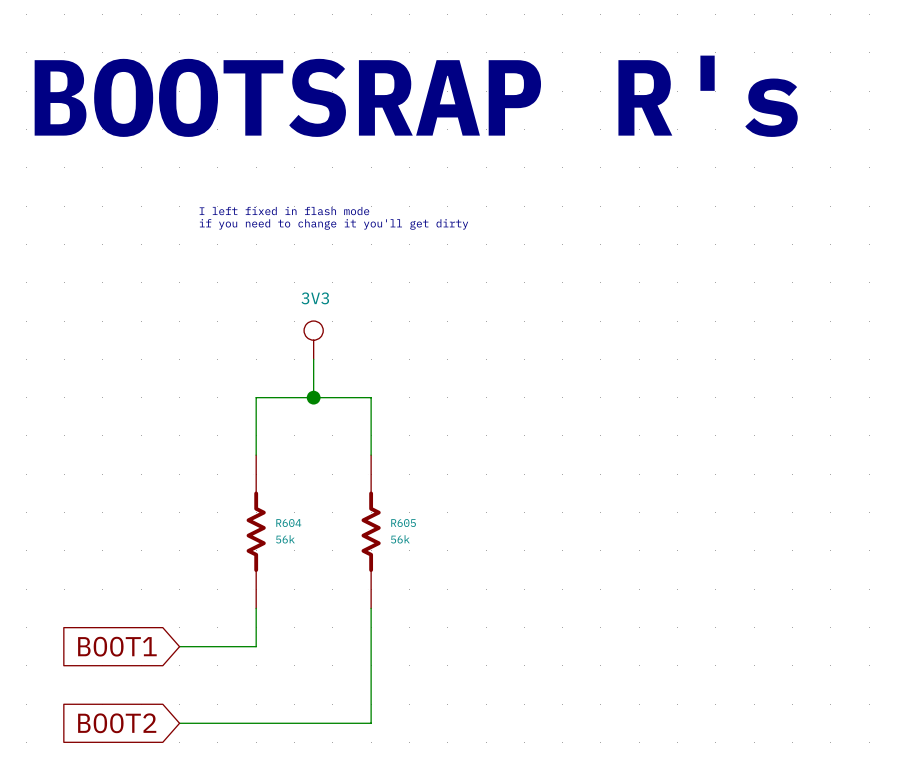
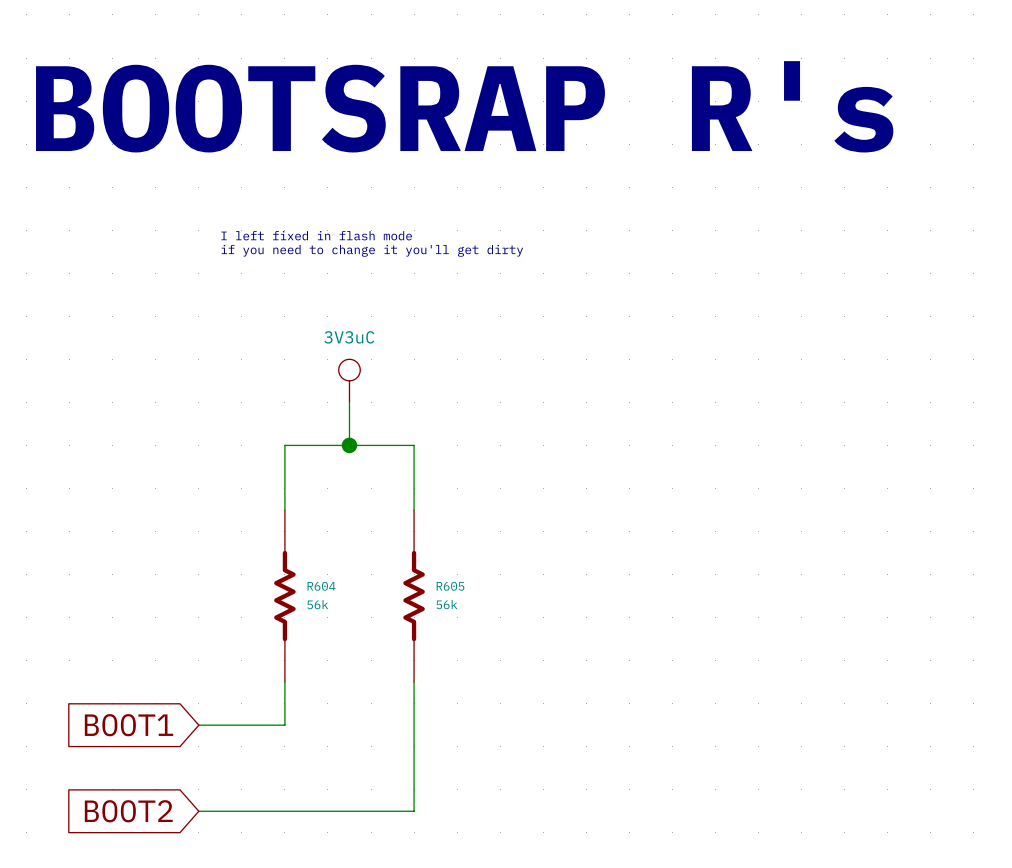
power symbol: 3V3 (313, 340) -> 3V3uC (349, 380)

